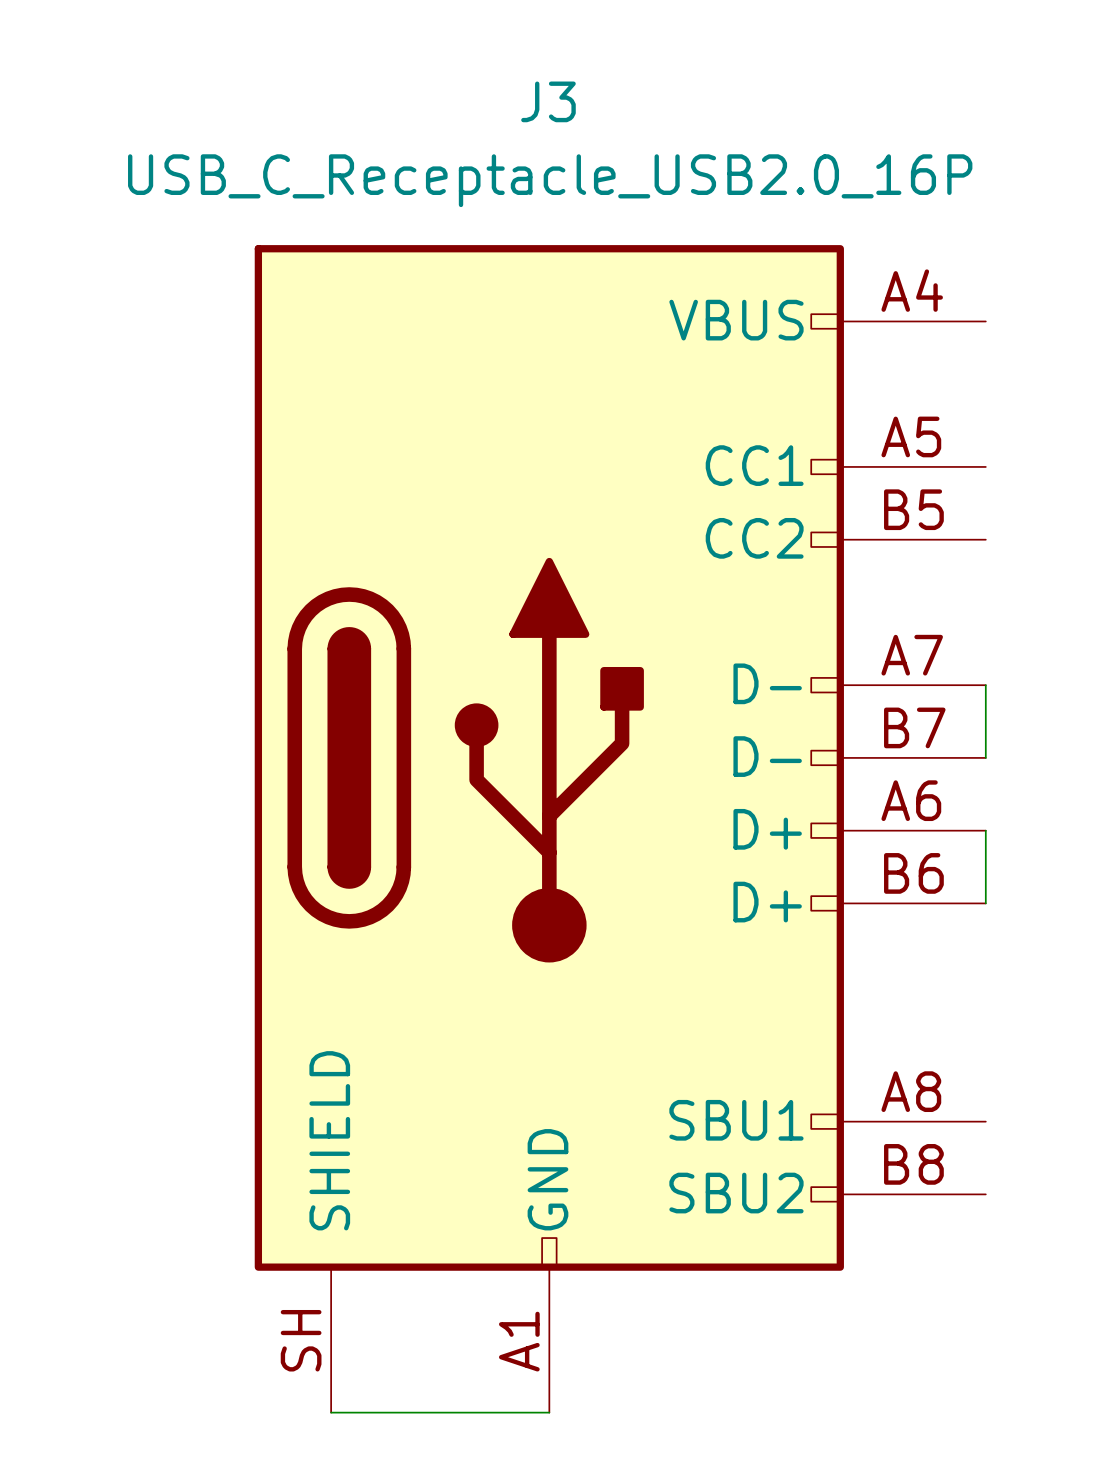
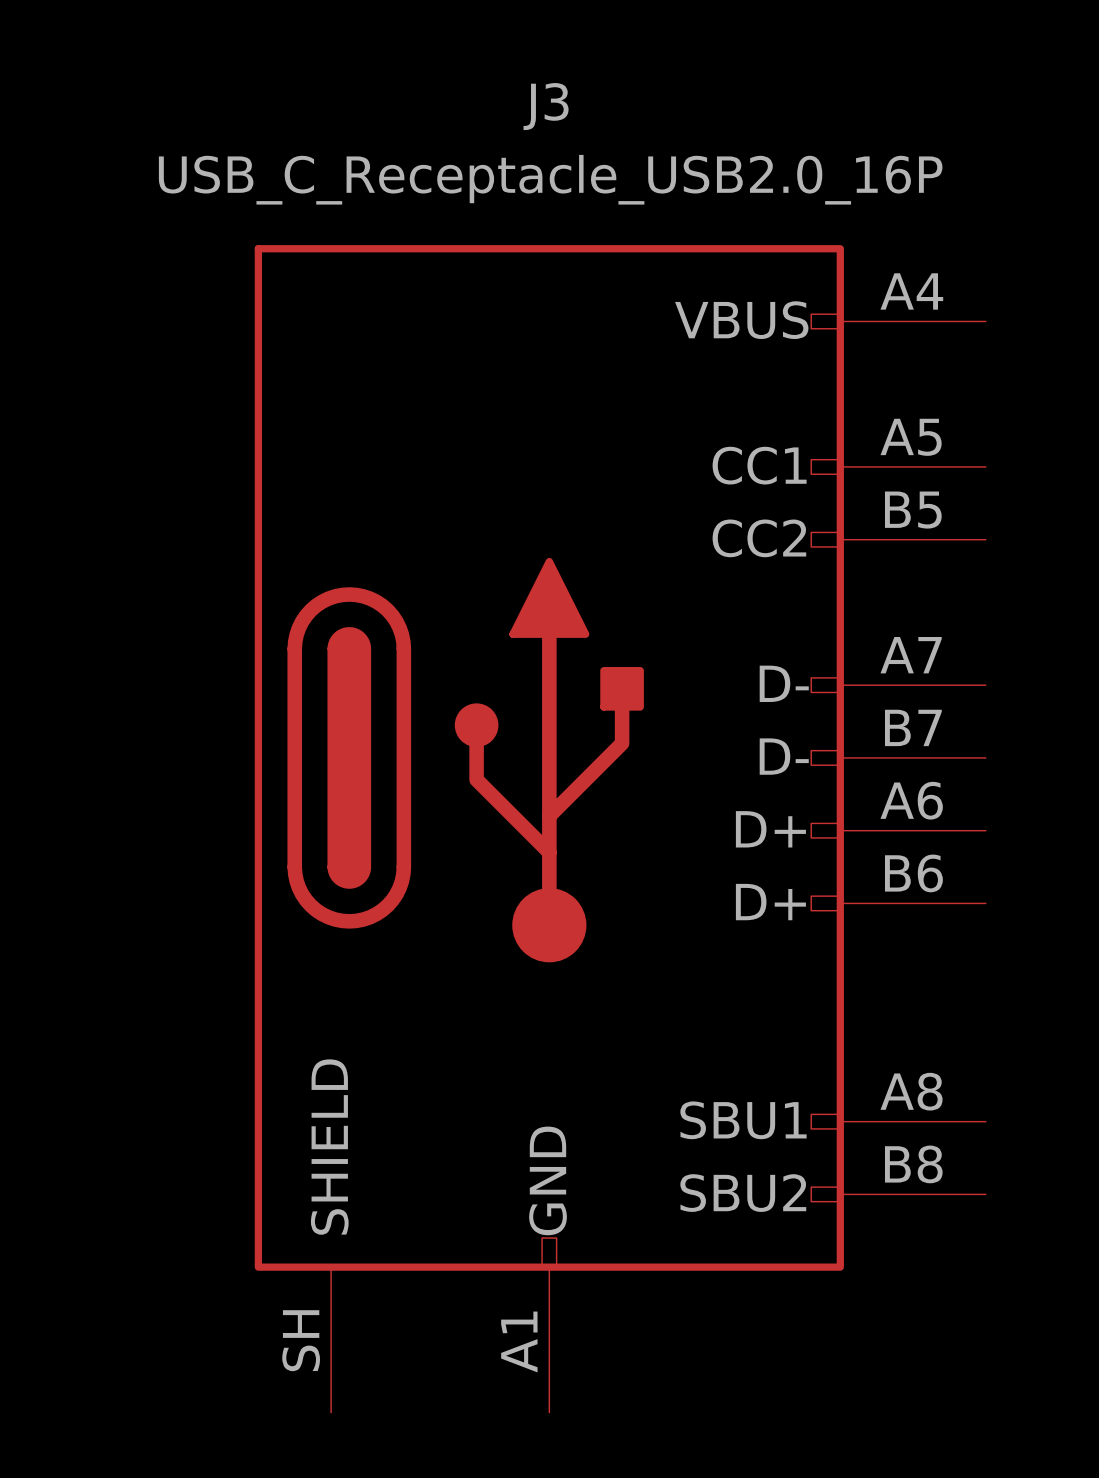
wire: (985, 685) (985, 757) -> none
wire: (985, 830) (985, 903) -> none
wire: (331, 1412) (549, 1412) -> none

